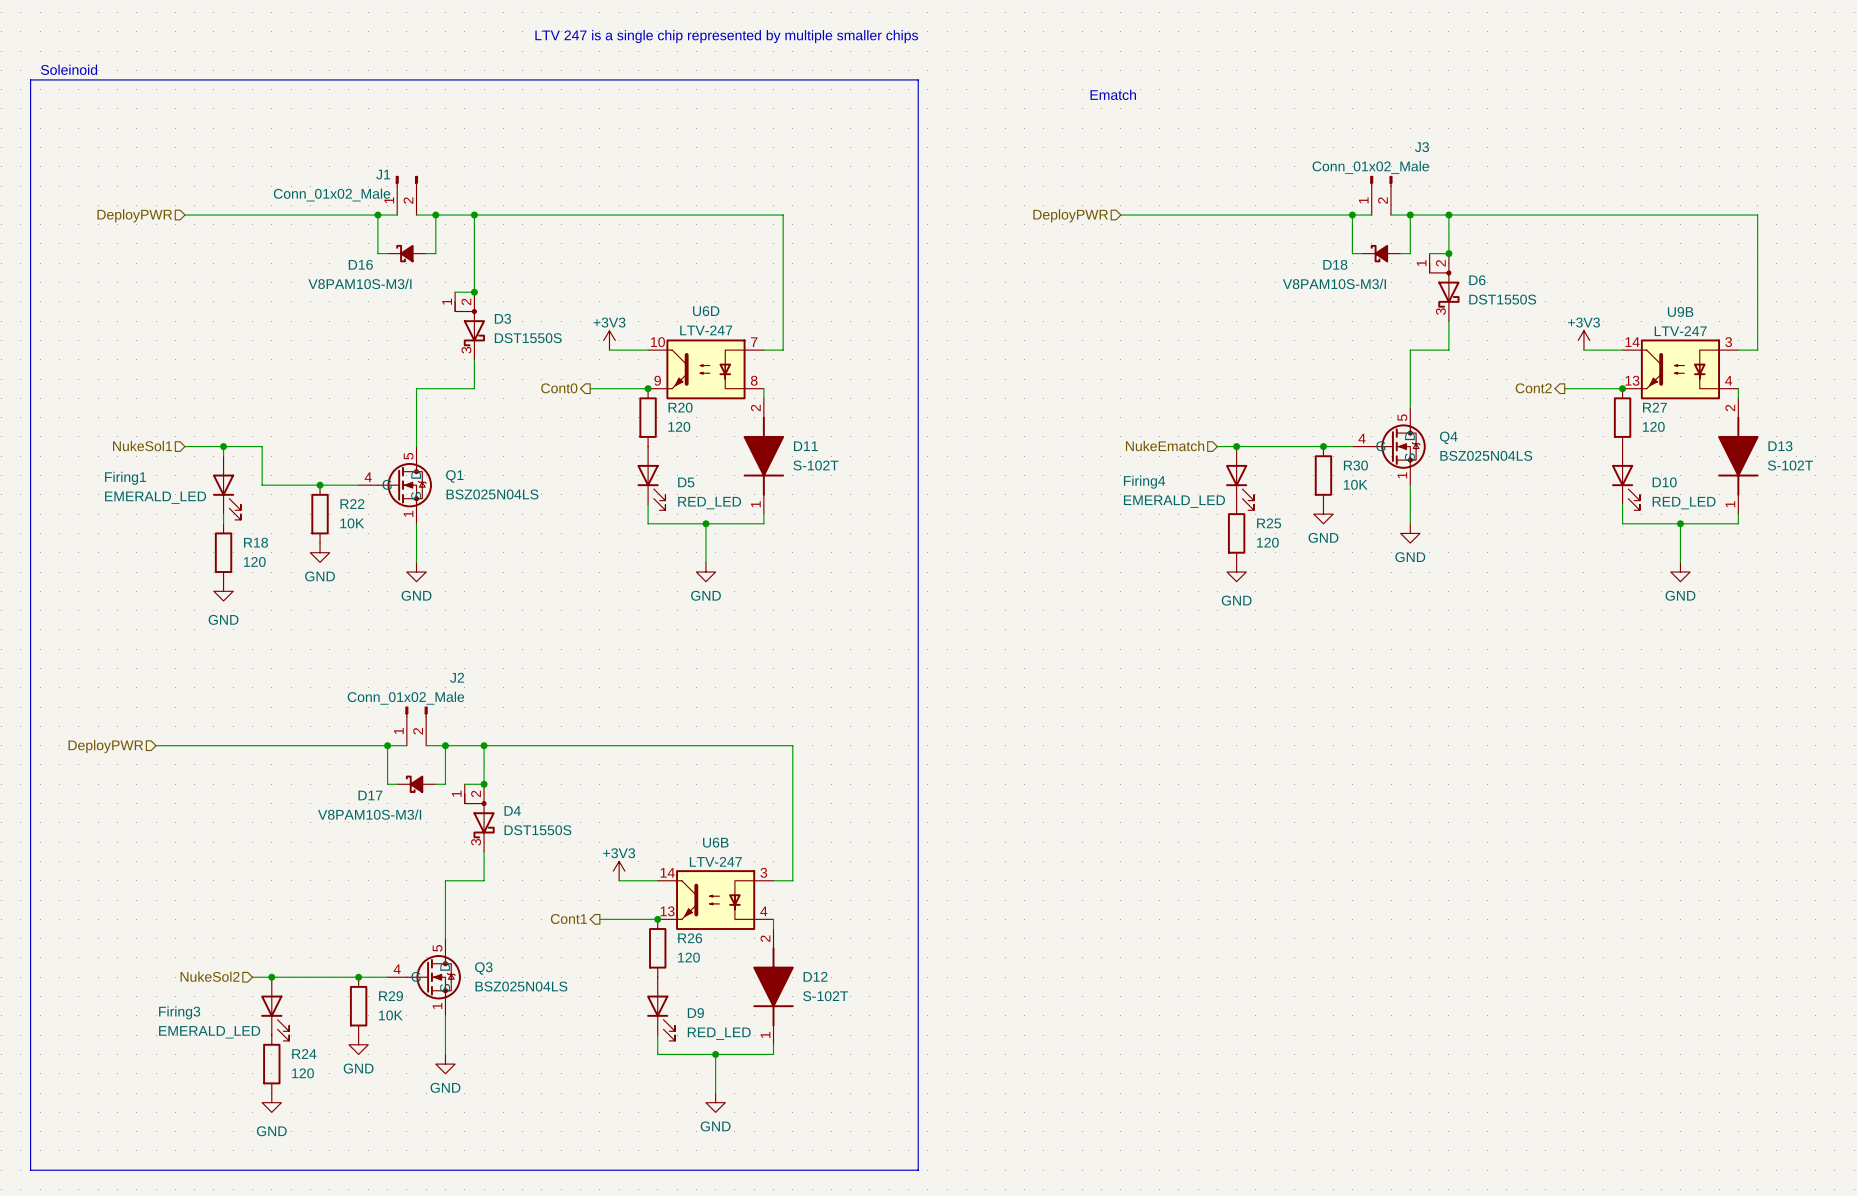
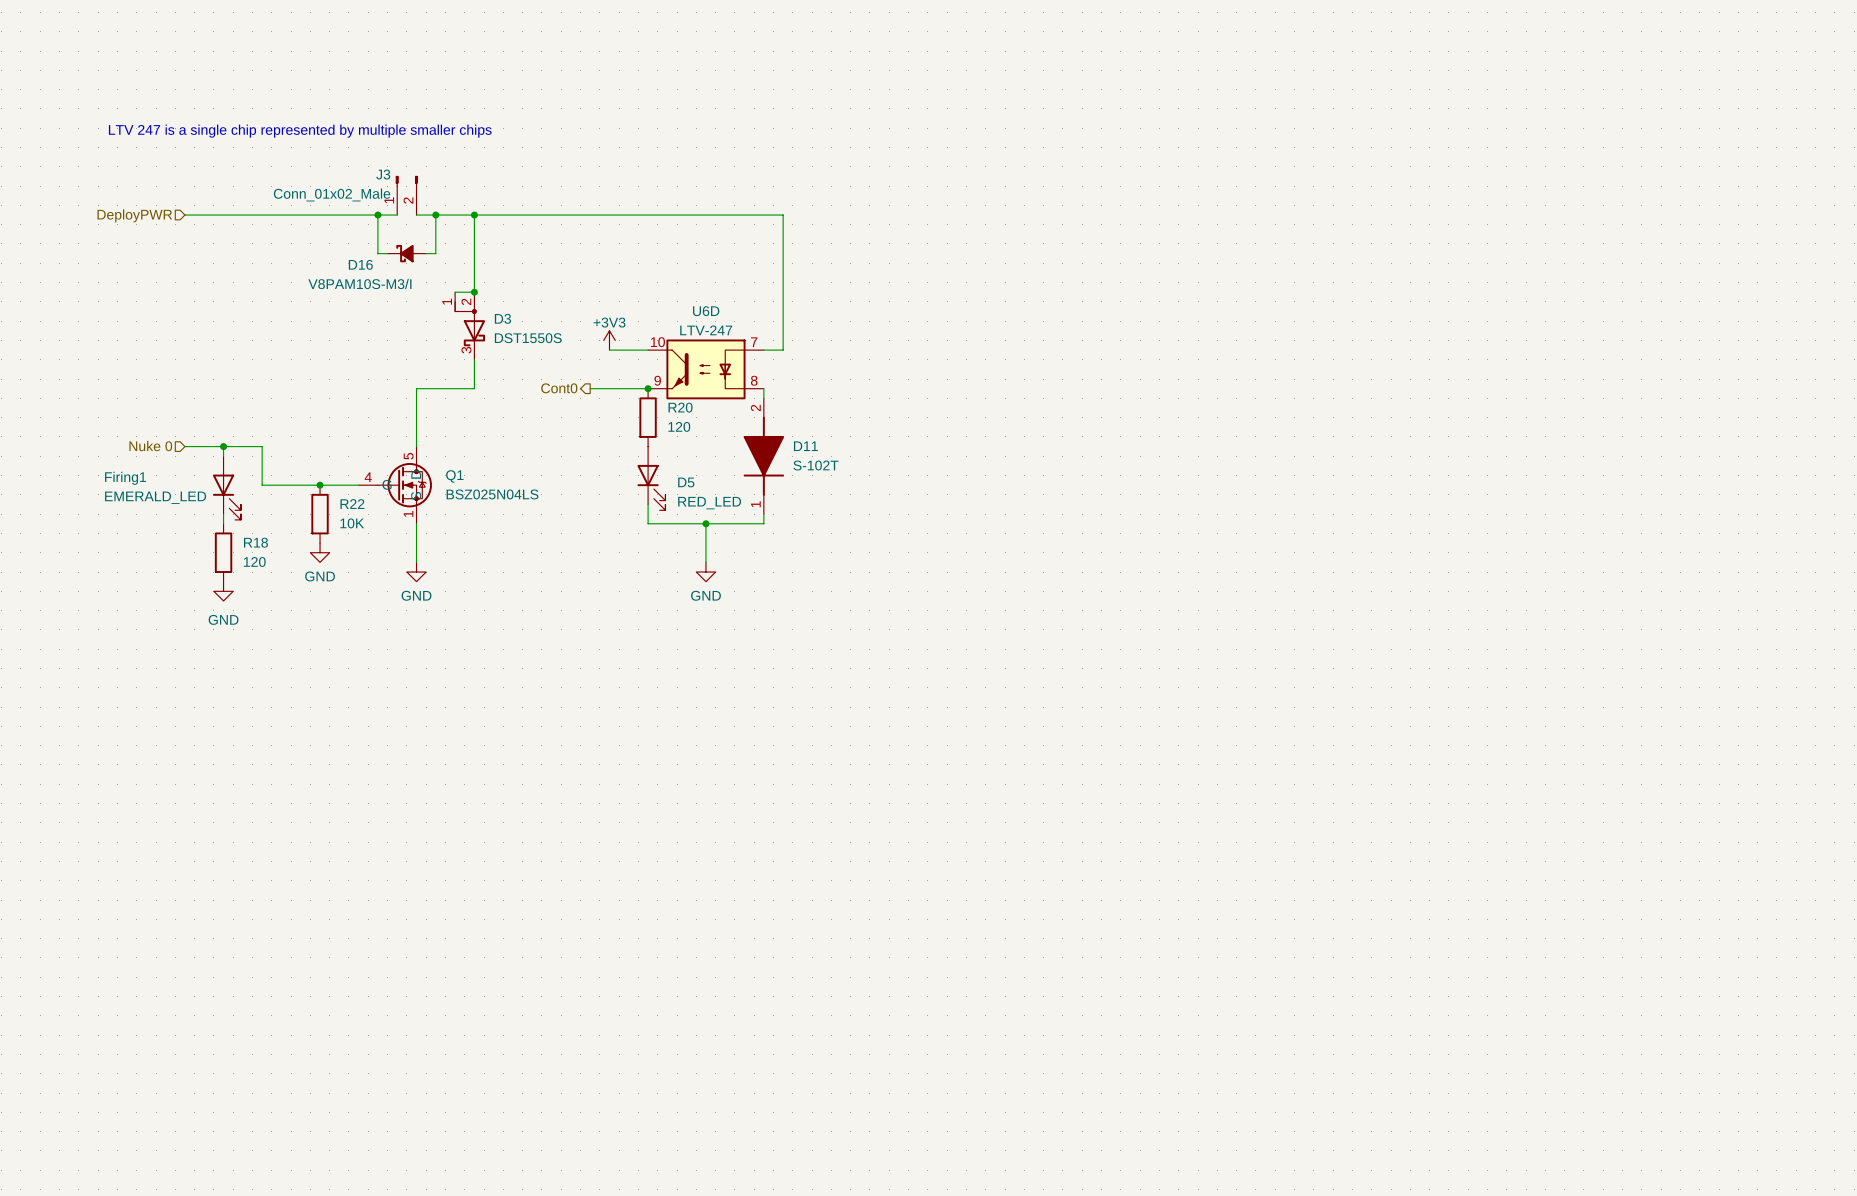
text: LTV 247 is a single chip represented by multiple smaller chips (726, 36) -> none
text: Soleinoid (69, 69) -> none
line: (30, 79) (918, 79) (918, 1170) (30, 1170) (30, 79) -> none
text: Ematch (1113, 94) -> none
text: none -> LTV 247 is a single chip represented by multiple smaller chips (300, 131)
J1 name: J1 (383, 174) -> J3 (383, 174)
J3: Conn_01x02_Male (1381, 195) -> none
hierarchical label: DeployPWR (1070, 215) -> none
wire: (1120, 215) (1371, 215) -> none
wire: (1352, 215) (1352, 253) (1362, 253) -> none
junction: (1352, 215) -> none
wire: (1391, 215) (1757, 215) (1757, 350) (1738, 350) -> none
wire: (1410, 215) (1410, 253) (1400, 253) -> none
junction: (1410, 215) -> none
wire: (1448, 215) (1448, 253) (1429, 253) -> none
junction: (1448, 215) -> none
D18: V8PAM10S-M3/I (1381, 253) -> none
junction: (1448, 253) -> none
D6: DST1550S (1444, 287) -> none
wire: (1448, 321) (1448, 350) (1410, 350) (1410, 407) -> none
power symbol: +3V3 (1583, 340) -> none
wire: (1583, 350) (1622, 350) -> none
U9B: LTV-247 (1680, 369) -> none
hierarchical label: Cont2 (1533, 388) -> none
wire: (1564, 388) (1622, 388) -> none
junction: (1622, 388) -> none
wire: (1738, 388) (1738, 398) -> none
R27: 120 (1622, 417) -> none
hierarchical label: NukeSol1 (142, 446) -> Nuke 0 (150, 446)
hierarchical label: NukeEmatch (1165, 446) -> none
wire: (1217, 446) (1352, 446) -> none
junction: (1236, 446) -> none
junction: (1323, 446) -> none
Q4: BSZ025N04LS (1389, 446) -> none
D13: S-102T (1738, 456) -> none
R30: 10K (1323, 475) -> none
Firing4: EMERALD_LED (1240, 478) -> none
D10: RED_LED (1625, 478) -> none
wire: (1410, 485) (1410, 523) -> none
wire: (1622, 504) (1622, 523) (1738, 523) (1738, 514) -> none
power symbol: GND (1323, 514) -> none
wire: (1680, 523) (1680, 562) -> none
junction: (1680, 523) -> none
R25: 120 (1236, 533) -> none
power symbol: GND (1410, 533) -> none
power symbol: GND (1236, 572) -> none
power symbol: GND (1680, 572) -> none
J2: Conn_01x02_Male (416, 726) -> none
wire: (156, 745) (406, 745) -> none
wire: (387, 745) (387, 784) (397, 784) -> none
junction: (387, 745) -> none
wire: (426, 745) (792, 745) (792, 880) (773, 880) -> none
wire: (445, 745) (445, 784) (435, 784) -> none
junction: (445, 745) -> none
wire: (484, 745) (484, 784) (464, 784) -> none
junction: (484, 745) -> none
hierarchical label: DeployPWR (105, 746) -> none
D17: V8PAM10S-M3/I (416, 784) -> none
junction: (484, 784) -> none
D4: DST1550S (479, 818) -> none
wire: (484, 851) (484, 880) (445, 880) (445, 938) -> none
power symbol: +3V3 (619, 871) -> none
wire: (619, 880) (657, 880) -> none
U6B: LTV-247 (715, 900) -> none
hierarchical label: Cont1 (568, 918) -> none
wire: (599, 919) (657, 919) -> none
junction: (657, 919) -> none
wire: (773, 919) (773, 929) -> none
R26: 120 (657, 948) -> none
hierarchical label: NukeSol2 (210, 976) -> none
wire: (252, 977) (387, 977) -> none
junction: (271, 977) -> none
junction: (358, 977) -> none
Q3: BSZ025N04LS (424, 977) -> none
D12: S-102T (773, 986) -> none
R29: 10K (358, 1006) -> none
Firing3: EMERALD_LED (275, 1009) -> none
D9: RED_LED (661, 1009) -> none
wire: (445, 1015) (445, 1054) -> none
wire: (657, 1035) (657, 1054) (773, 1054) (773, 1044) -> none
power symbol: GND (358, 1044) -> none
wire: (715, 1054) (715, 1093) -> none
junction: (715, 1054) -> none
R24: 120 (271, 1064) -> none
power symbol: GND (445, 1064) -> none
power symbol: GND (271, 1102) -> none
power symbol: GND (715, 1102) -> none

